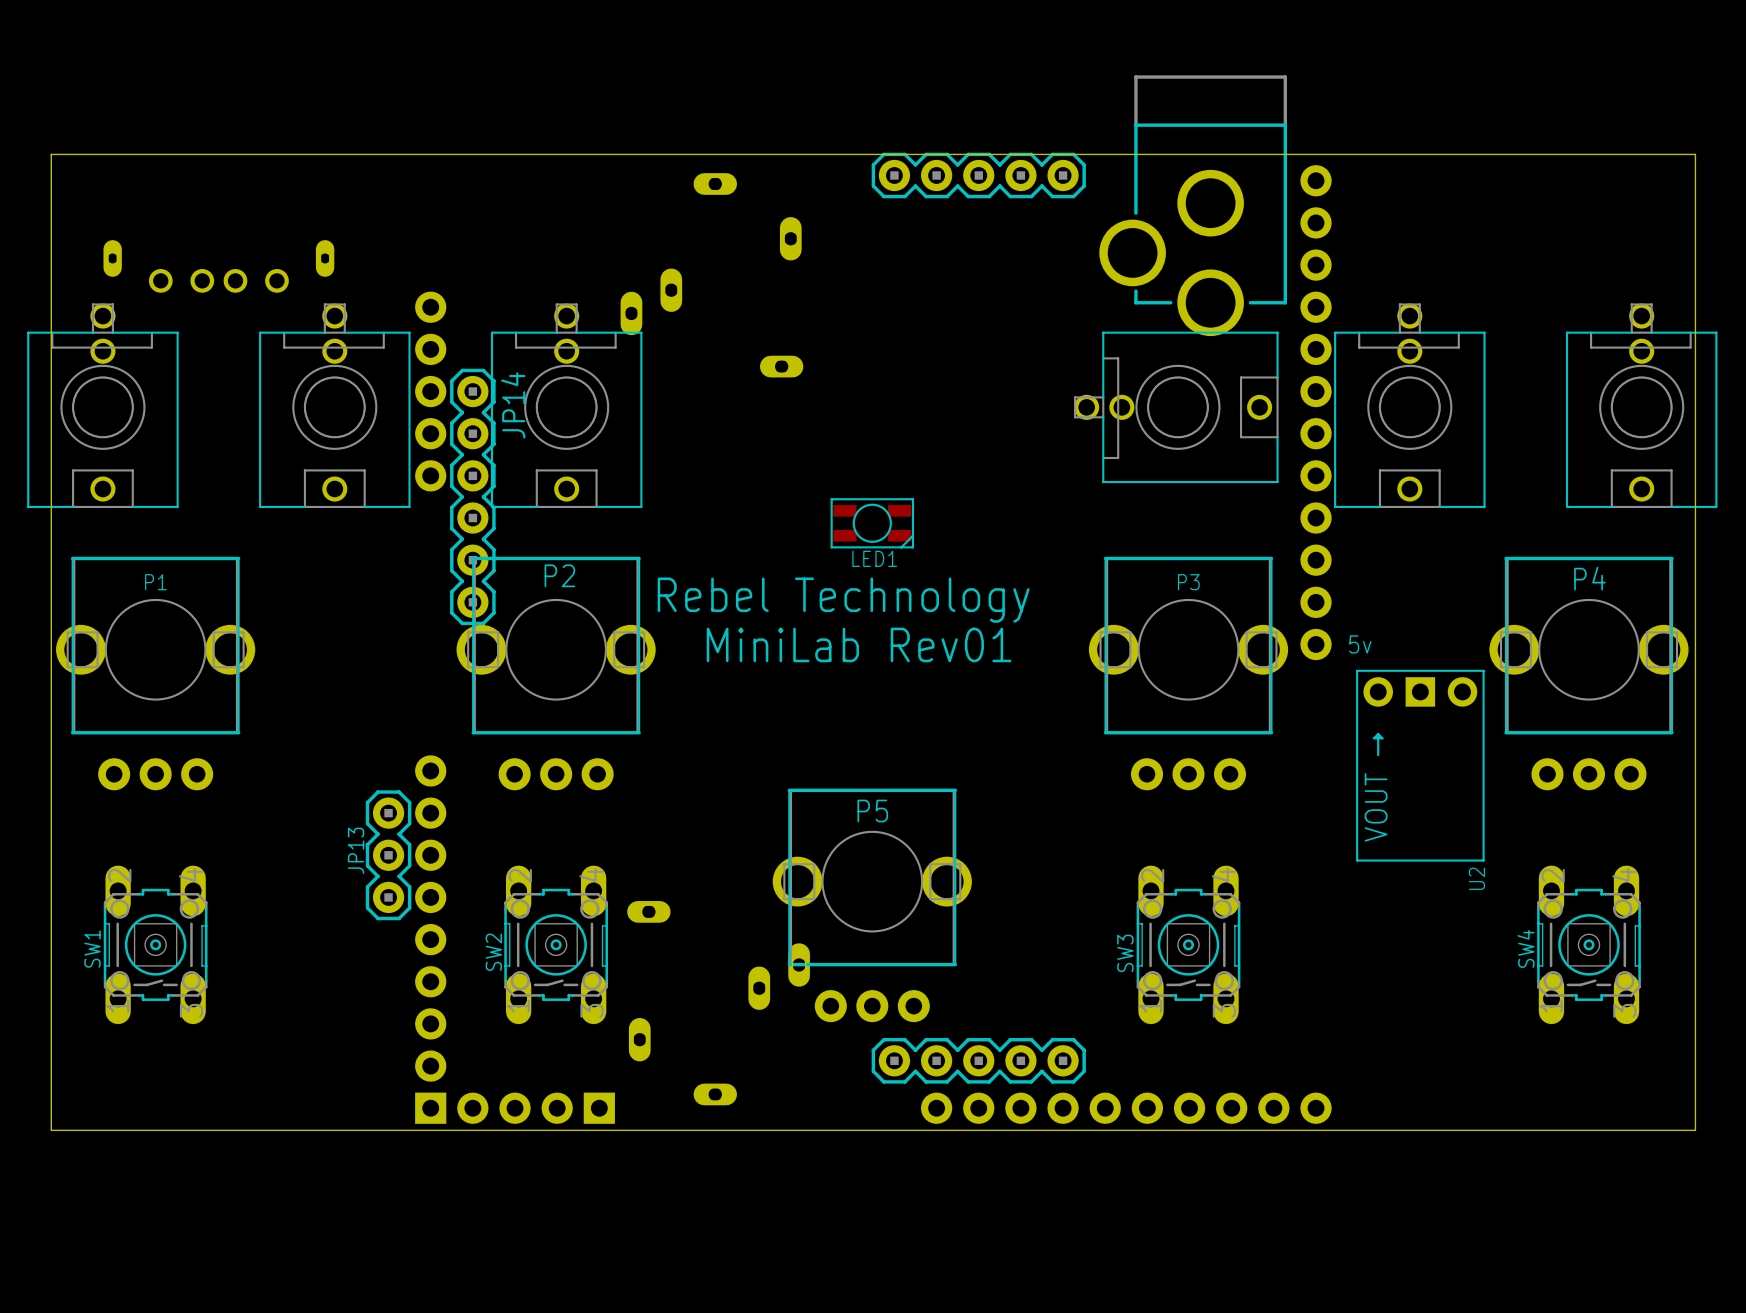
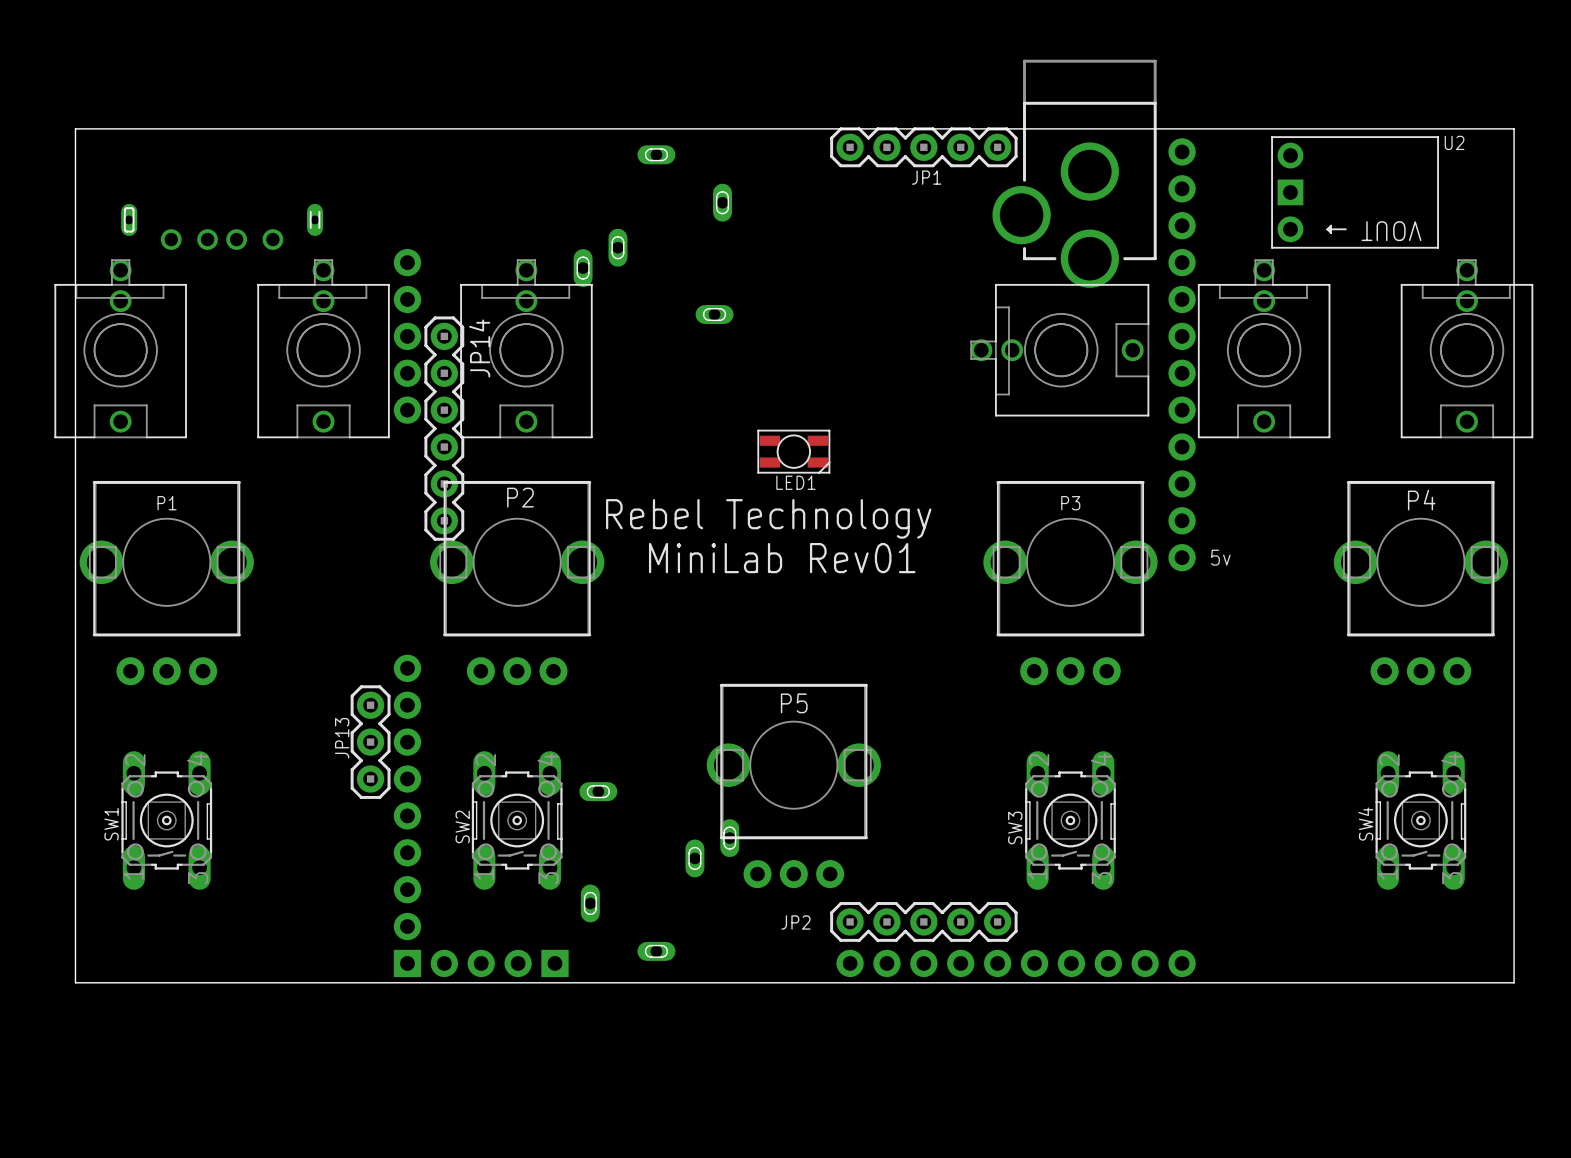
part: (978, 175) -> none
JP1: none -> (923, 147)
U2 rotation: 0° (1420, 765) -> 90° counterclockwise (1355, 192)
U2 position: (1420, 765) -> (1355, 192)
part: (978, 1060) -> none
JP2: none -> (923, 921)

